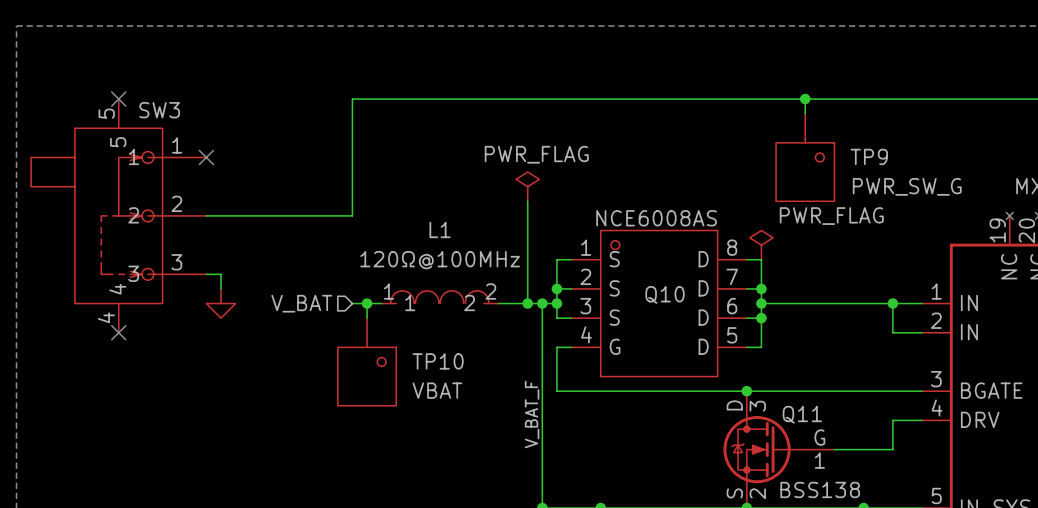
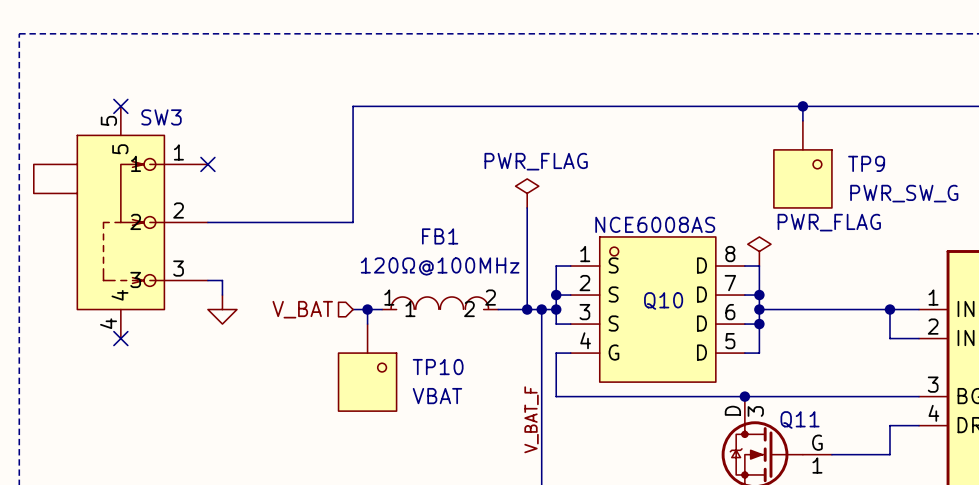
L1 name: L1 (440, 229) -> FB1 (440, 236)

